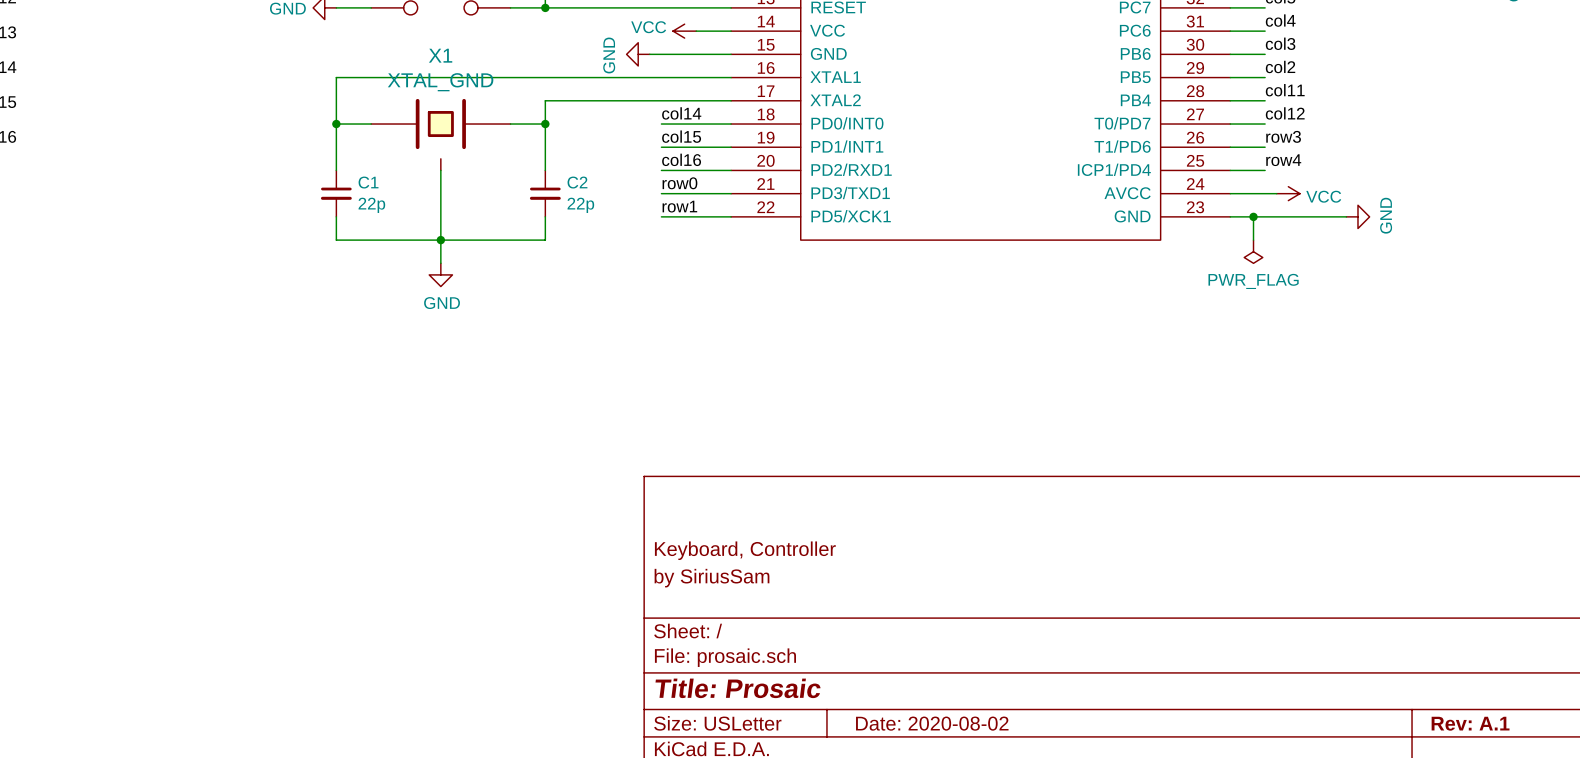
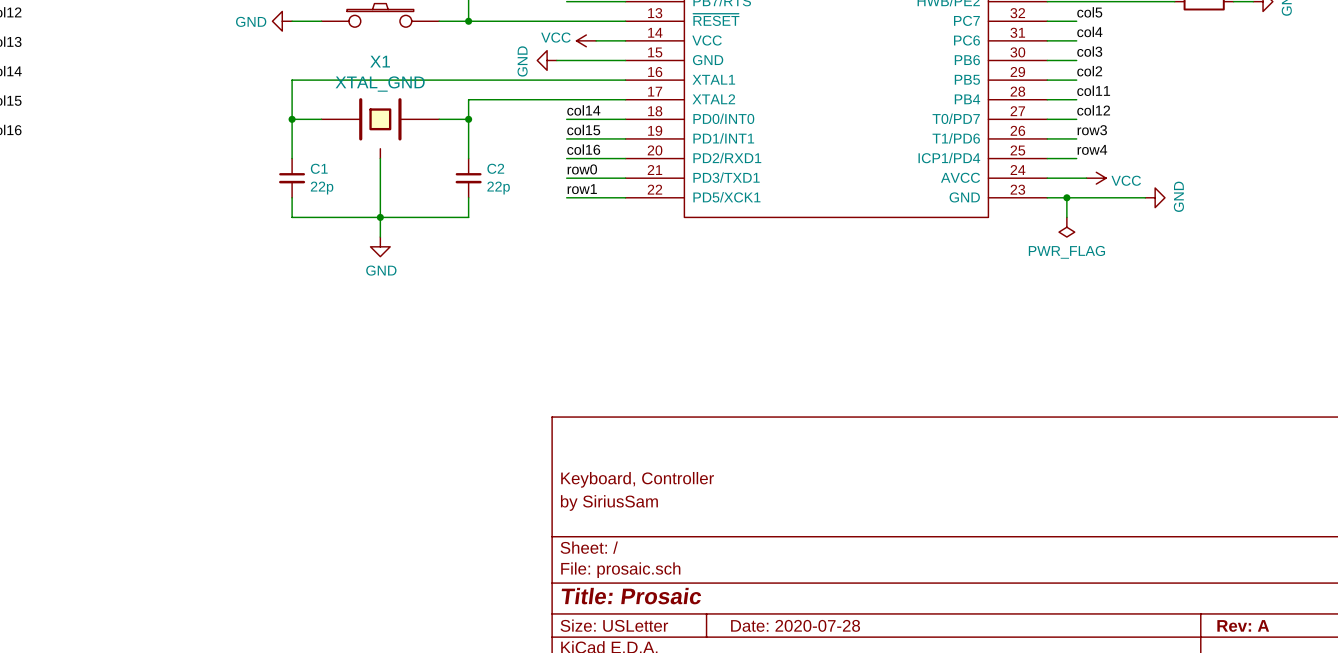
title block: Date: 2020-08-02 (932, 723) -> Date: 2020-07-28 (795, 625)
title block: Rev: A.1 (1470, 723) -> Rev: A (1243, 625)

